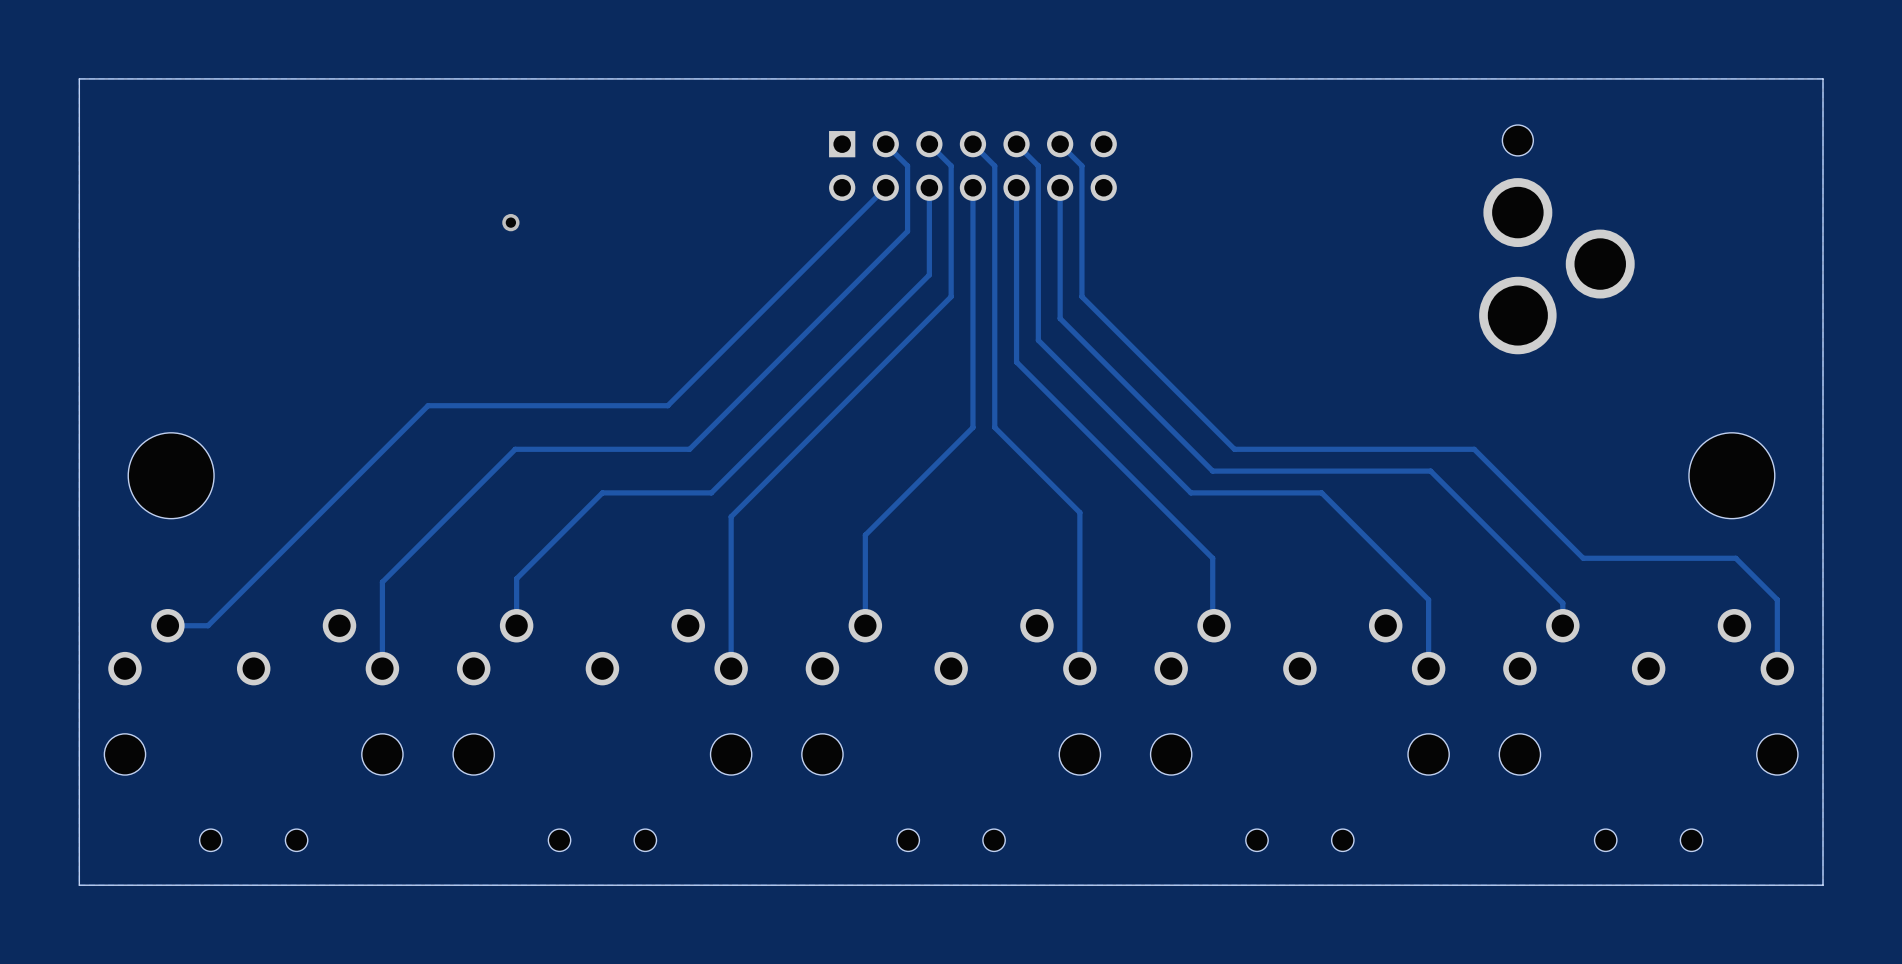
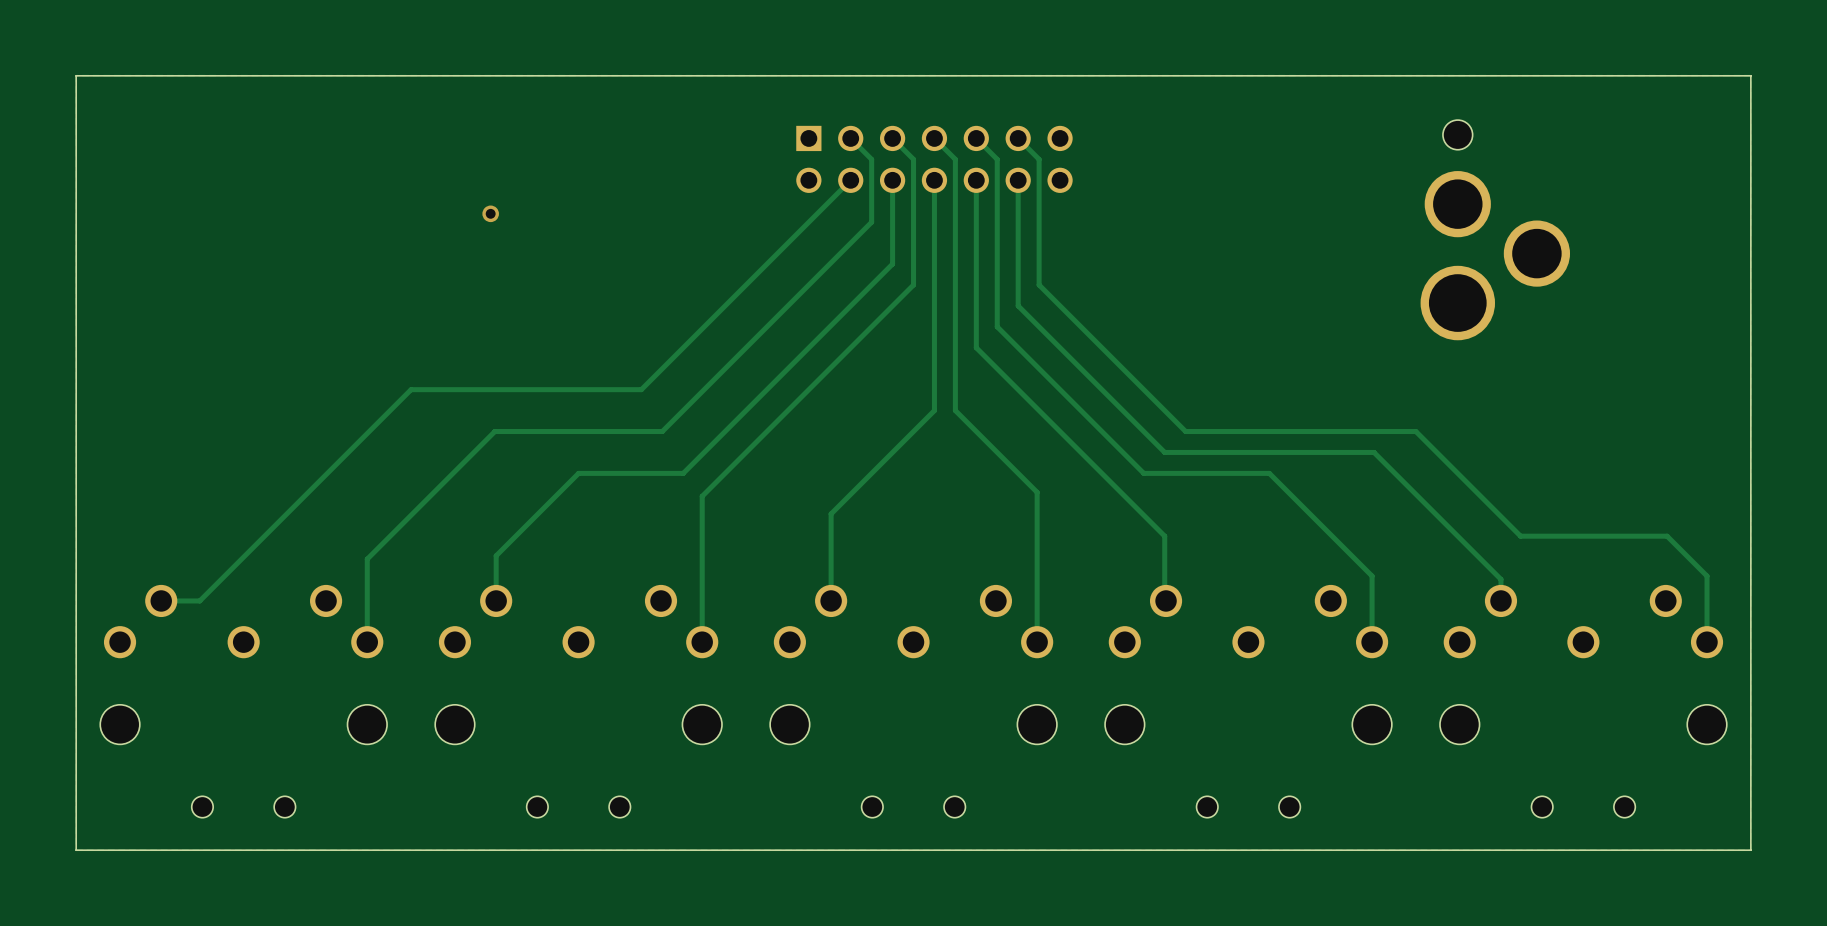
hole: (171, 475) -> none
hole: (1731, 475) -> none

